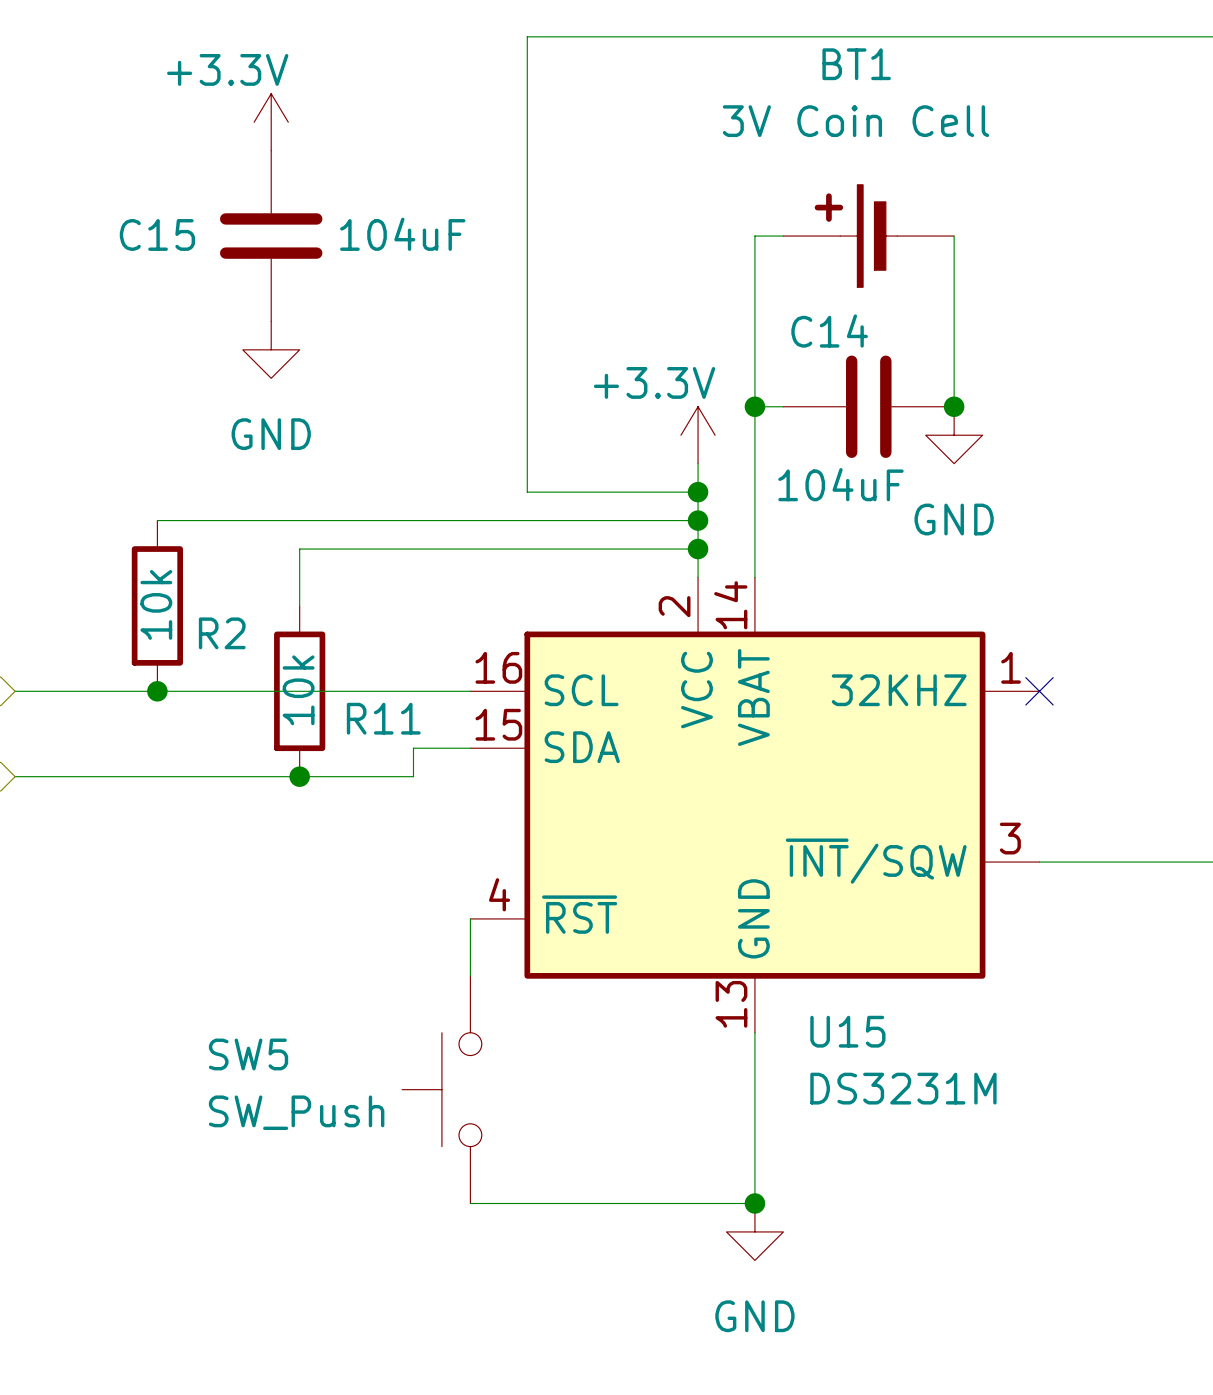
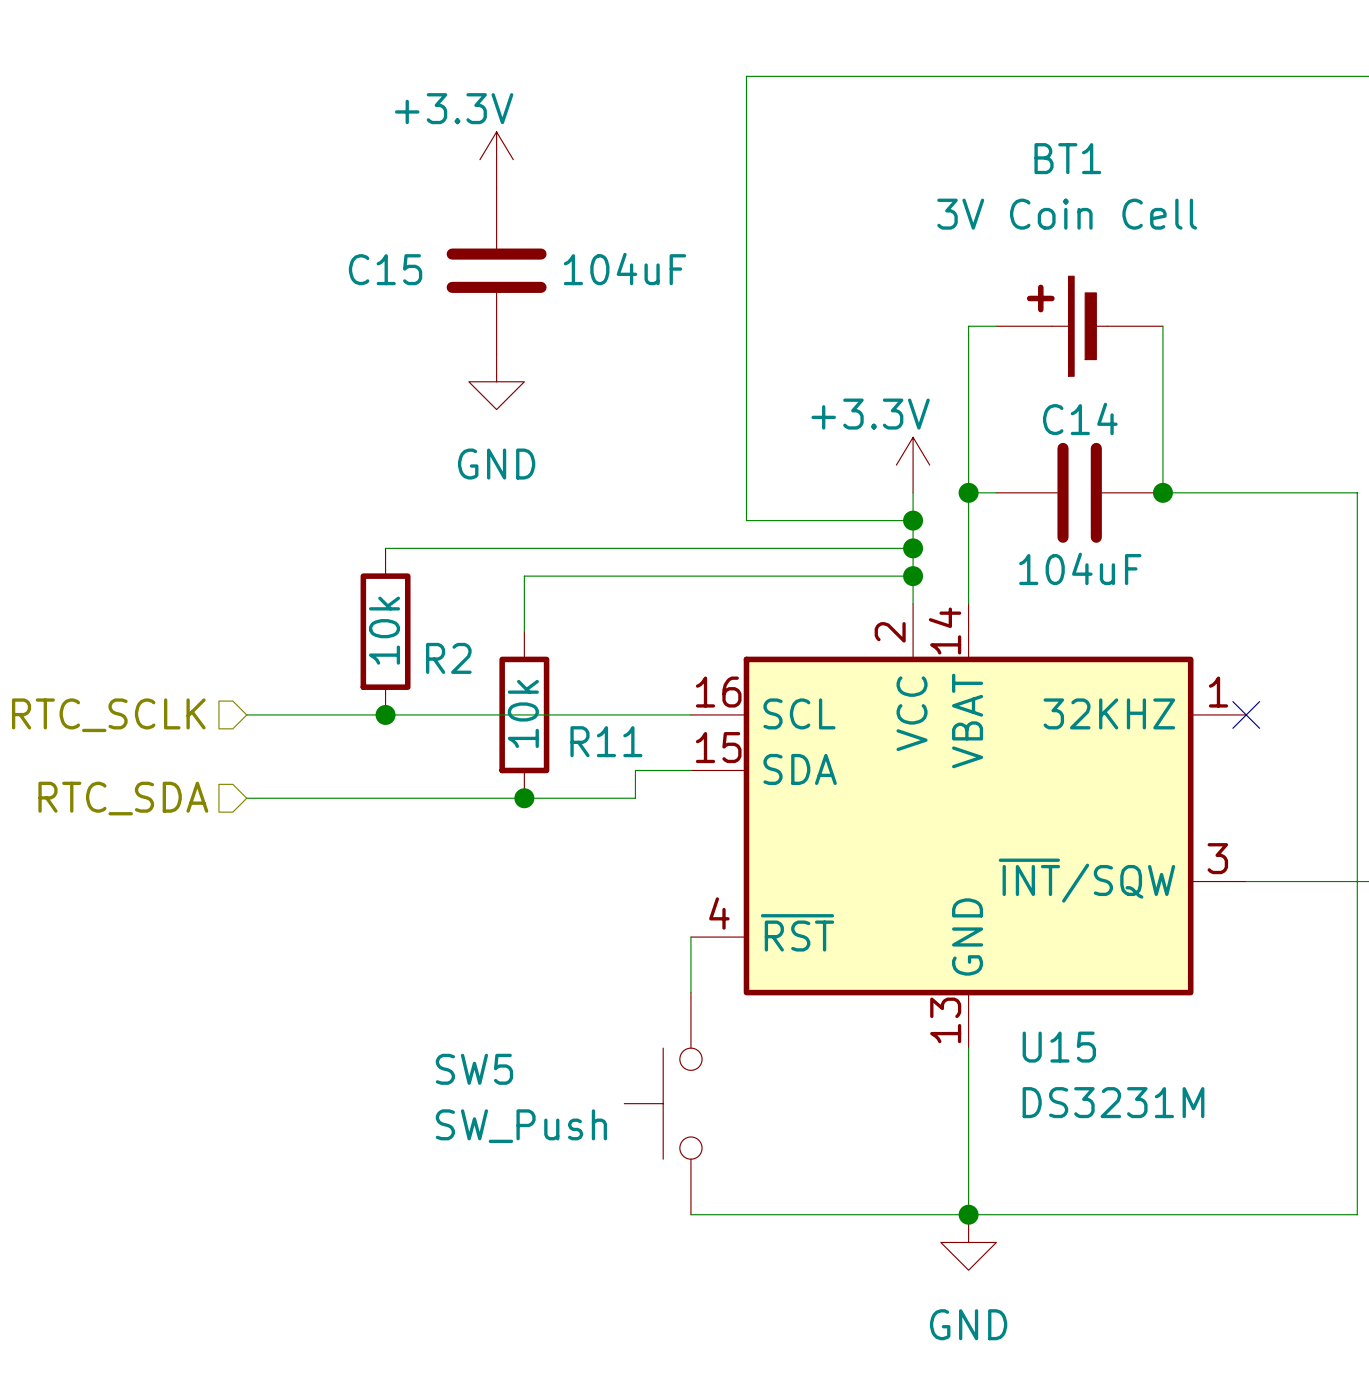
wire: (783, 236) (754, 236) (754, 292) -> (996, 326) (968, 326)
BT1 position: (868, 236) -> (1079, 326)
wire: (954, 236) (954, 292) -> none
C14 name position: C14 (829, 331) -> C14 (1080, 418)
wire: (754, 406) (783, 406) -> (968, 492) (996, 492)
junction position: (754, 406) -> (968, 492)
C14 position: (868, 406) -> (1079, 492)
wire: none -> (1162, 437) (1162, 492) (1357, 492) (1357, 1214) (968, 1214)
junction position: (954, 406) -> (1162, 492)
power symbol: GND (954, 435) -> none
C14 value position: 104uF (840, 484) -> 104uF (1080, 568)

